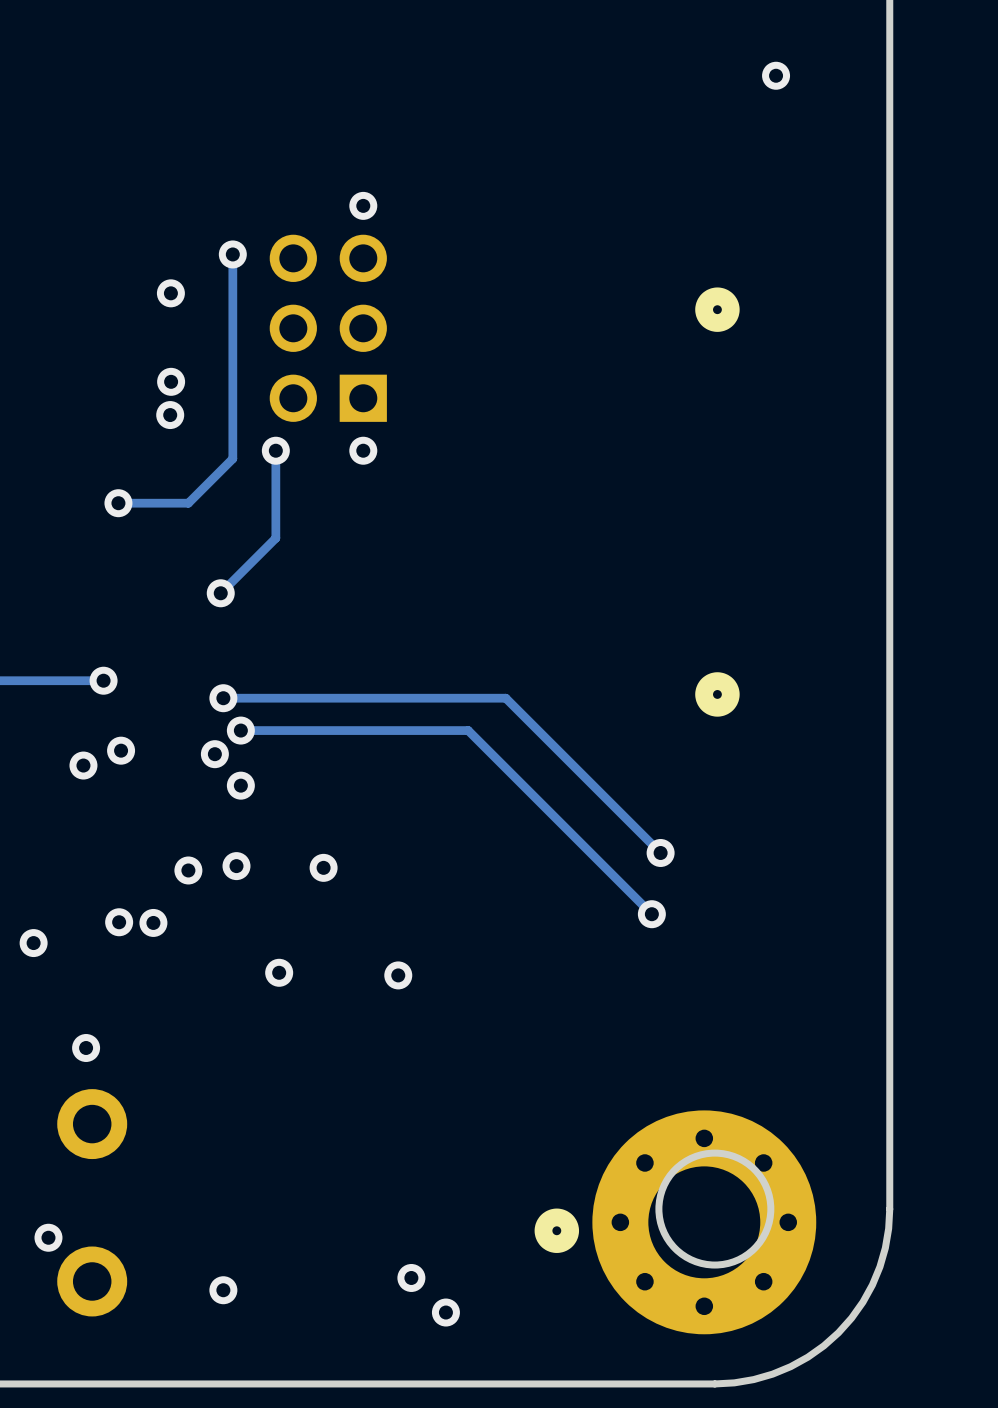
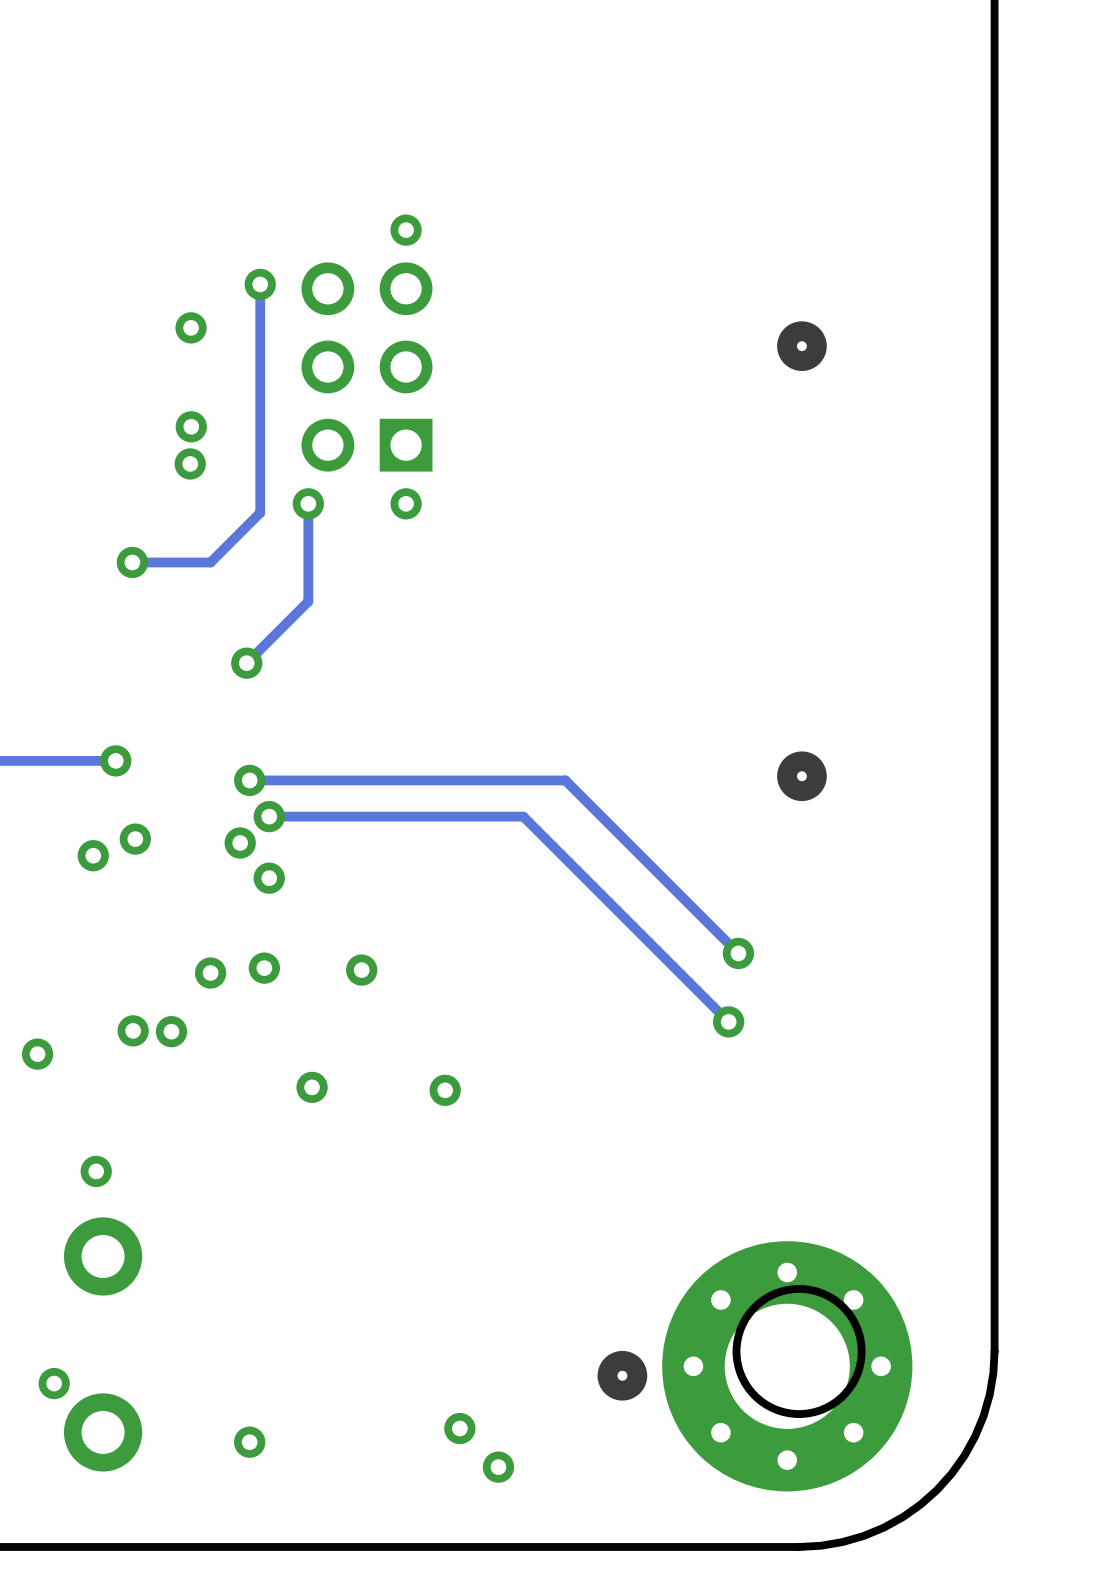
via: (776, 75) -> none

